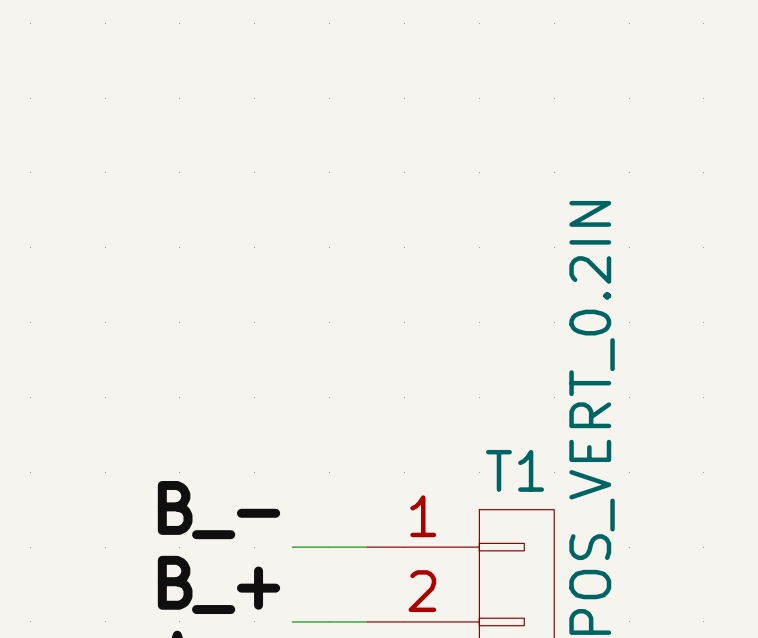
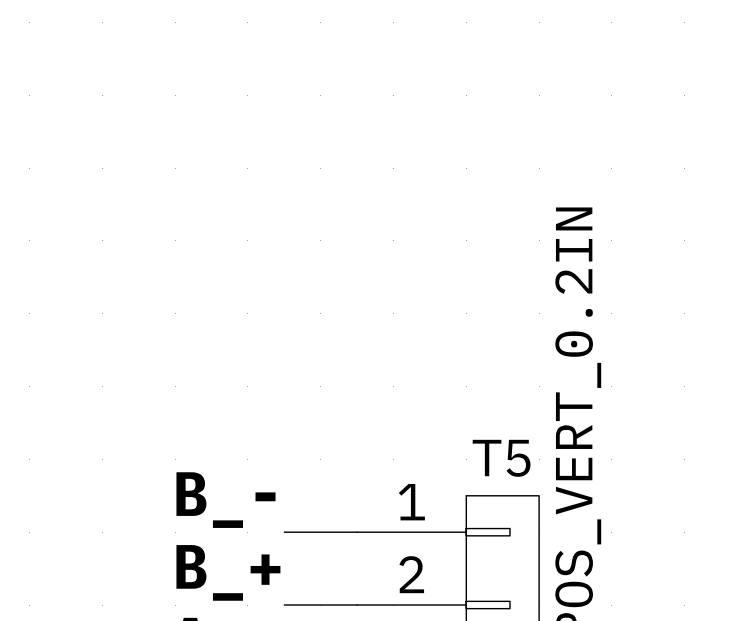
T1 name: T1 (515, 470) -> T5 (501, 458)

